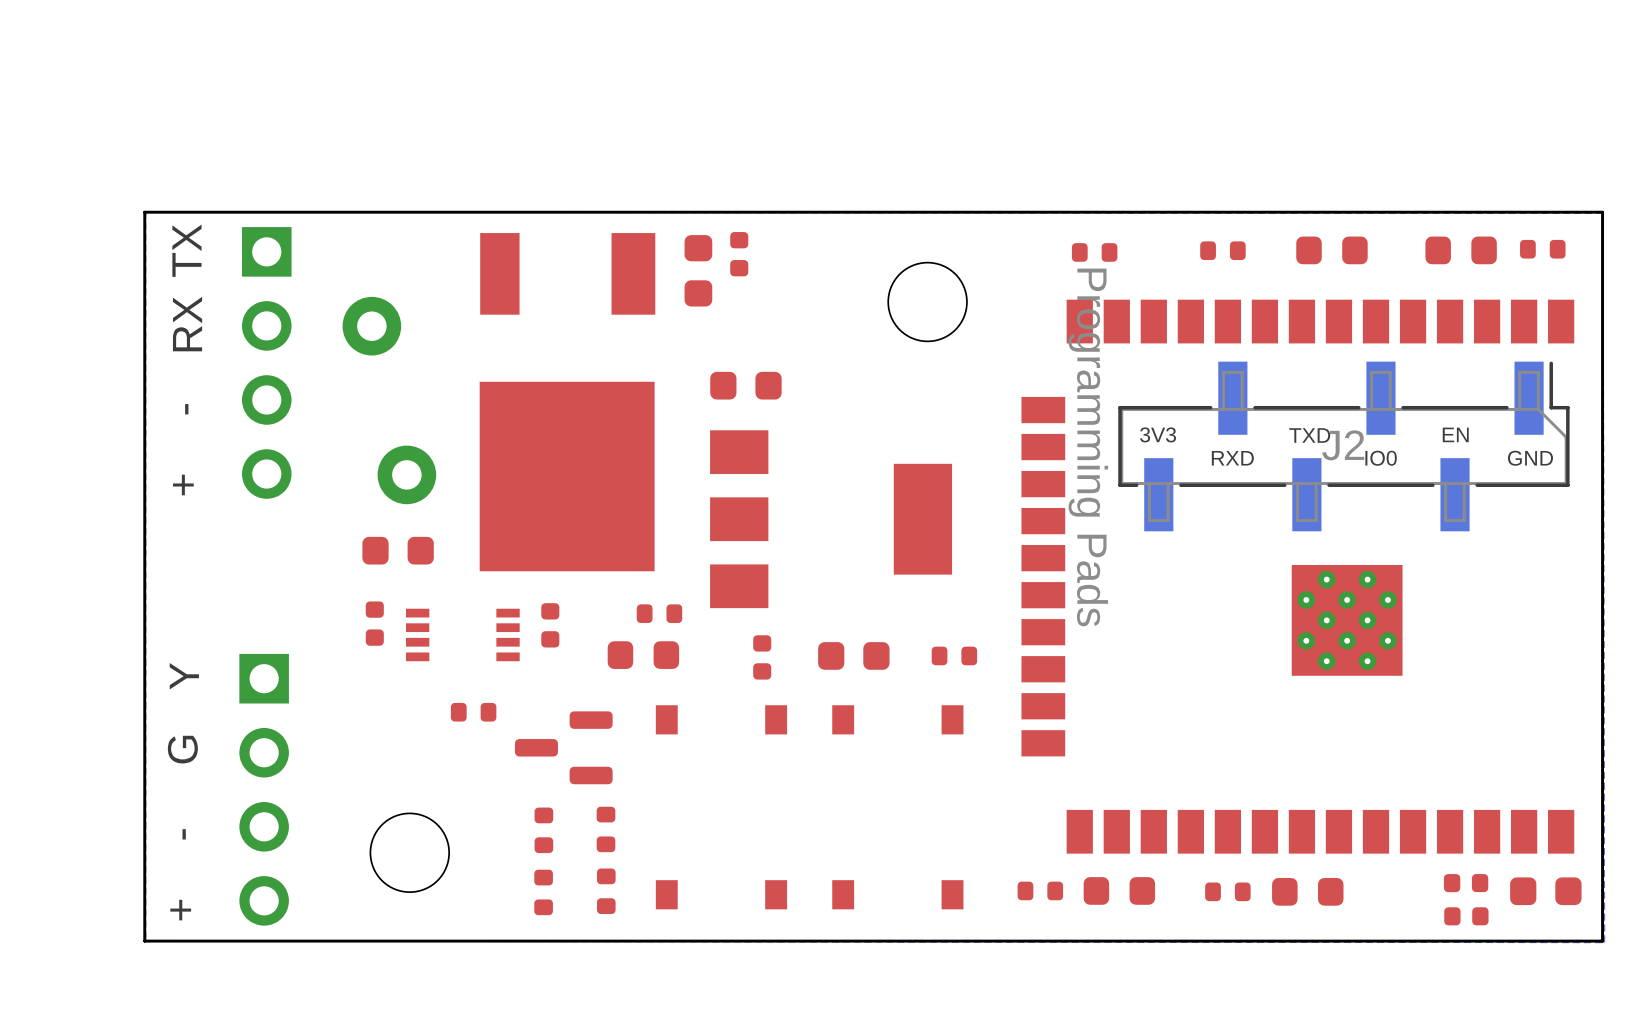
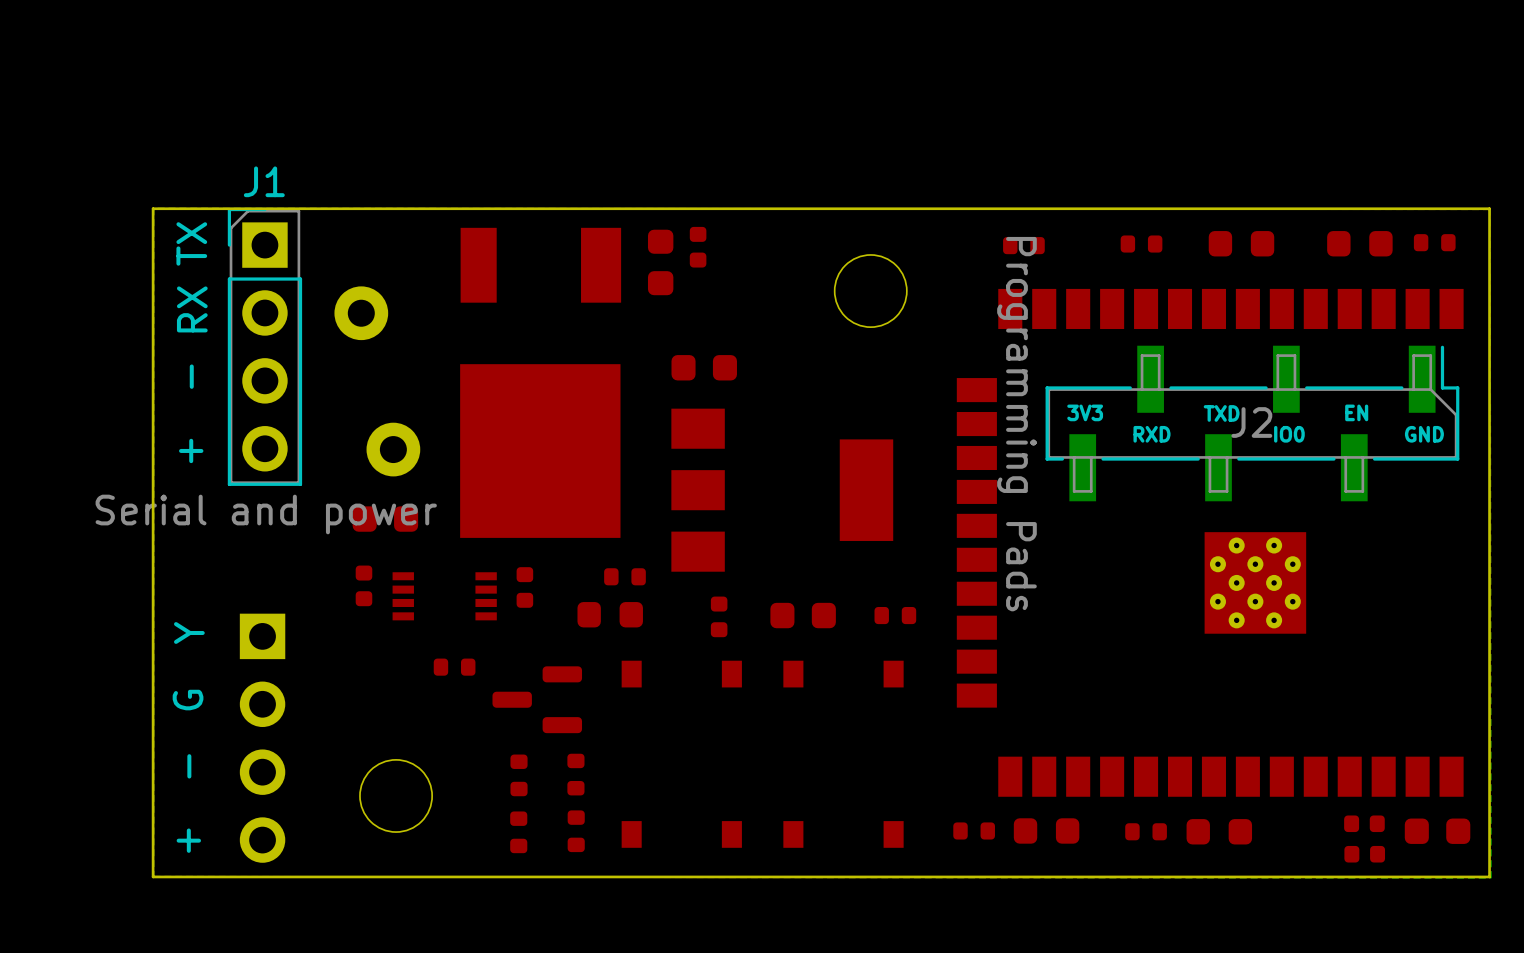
J1 side: top (266, 362) -> bottom (264, 346)

